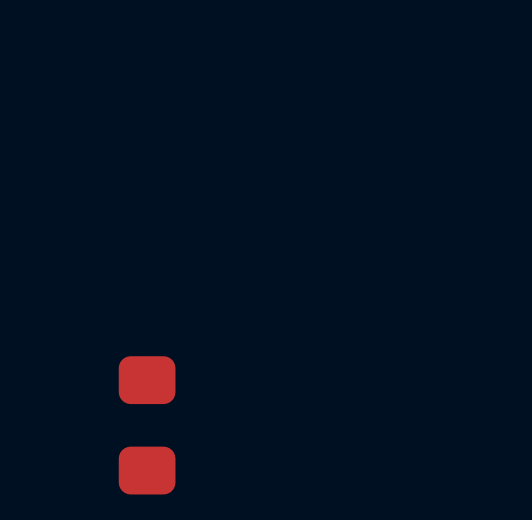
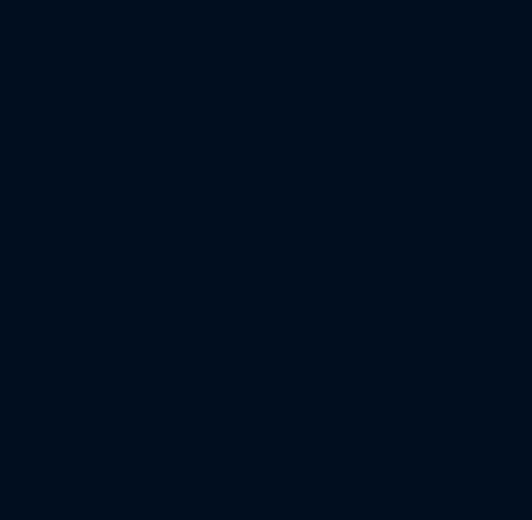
part: (147, 425) -> none

